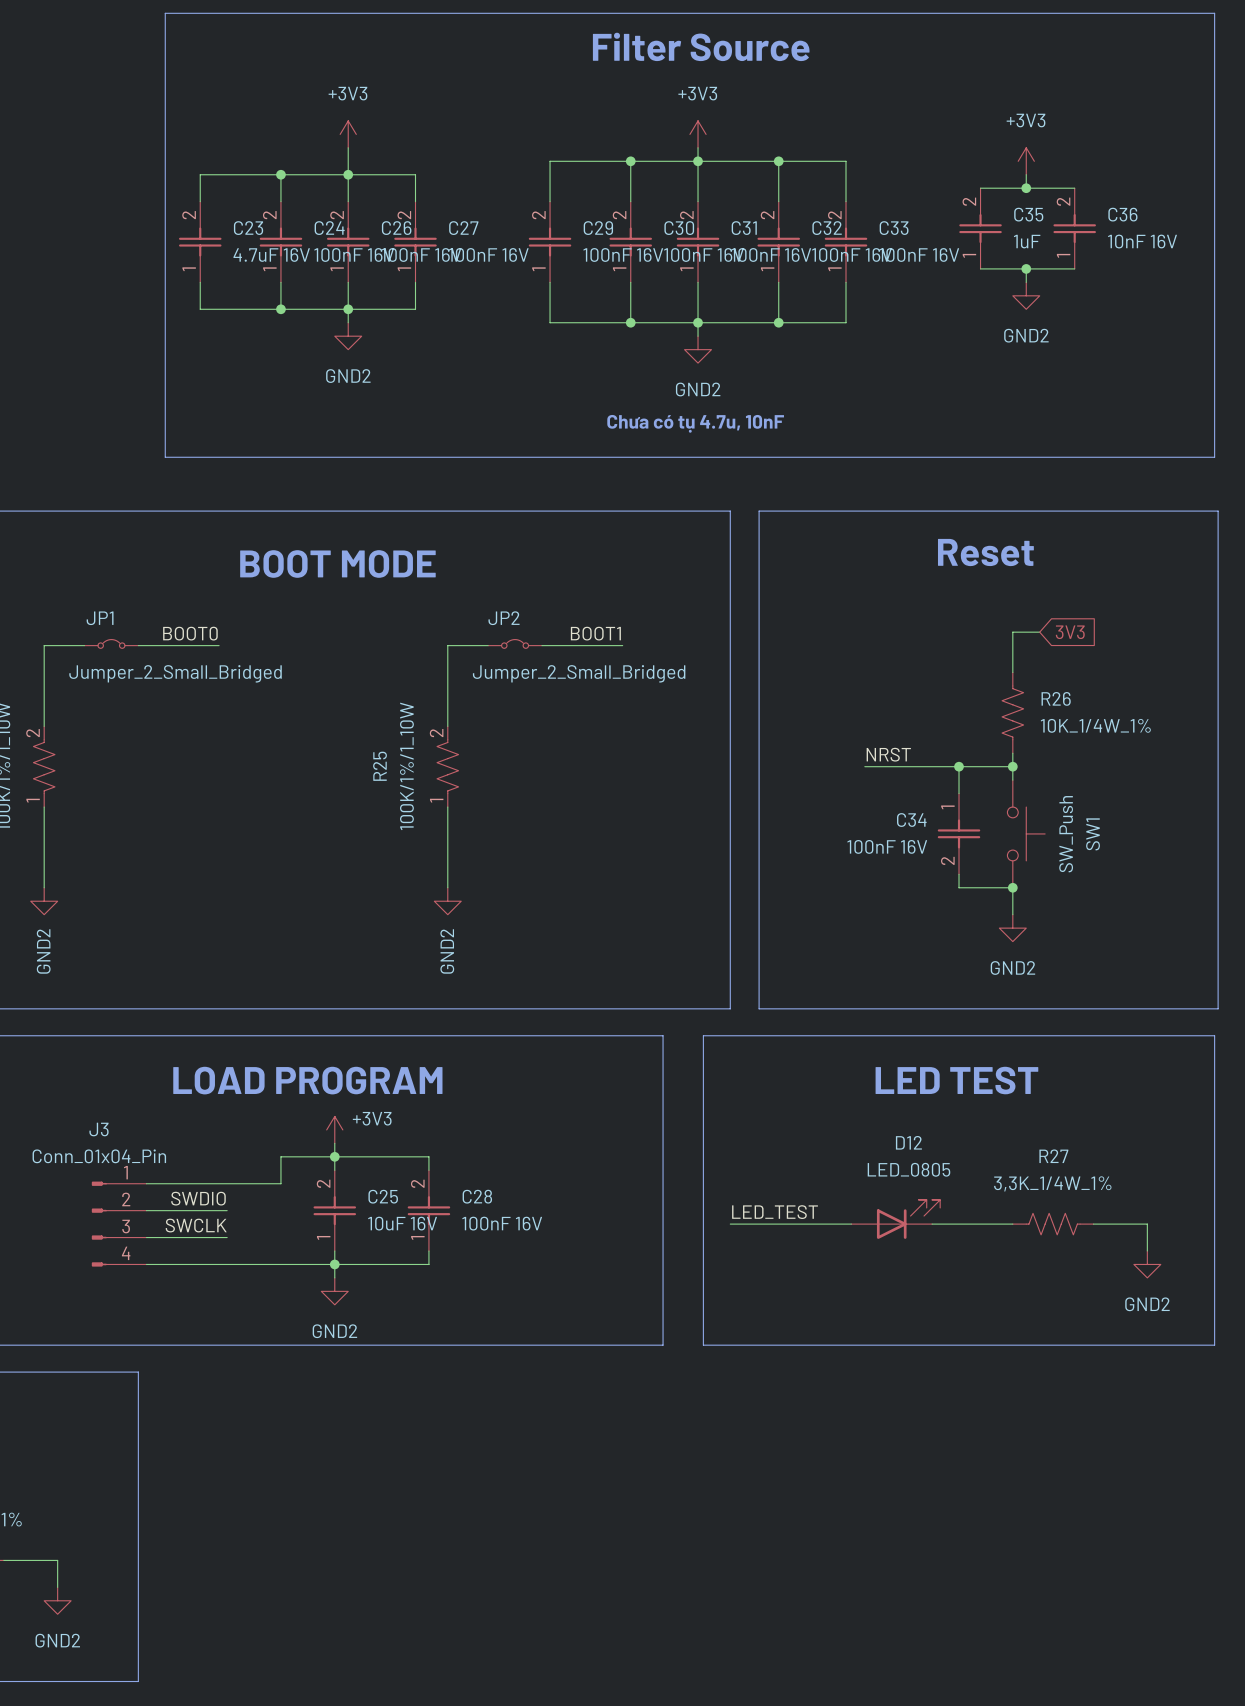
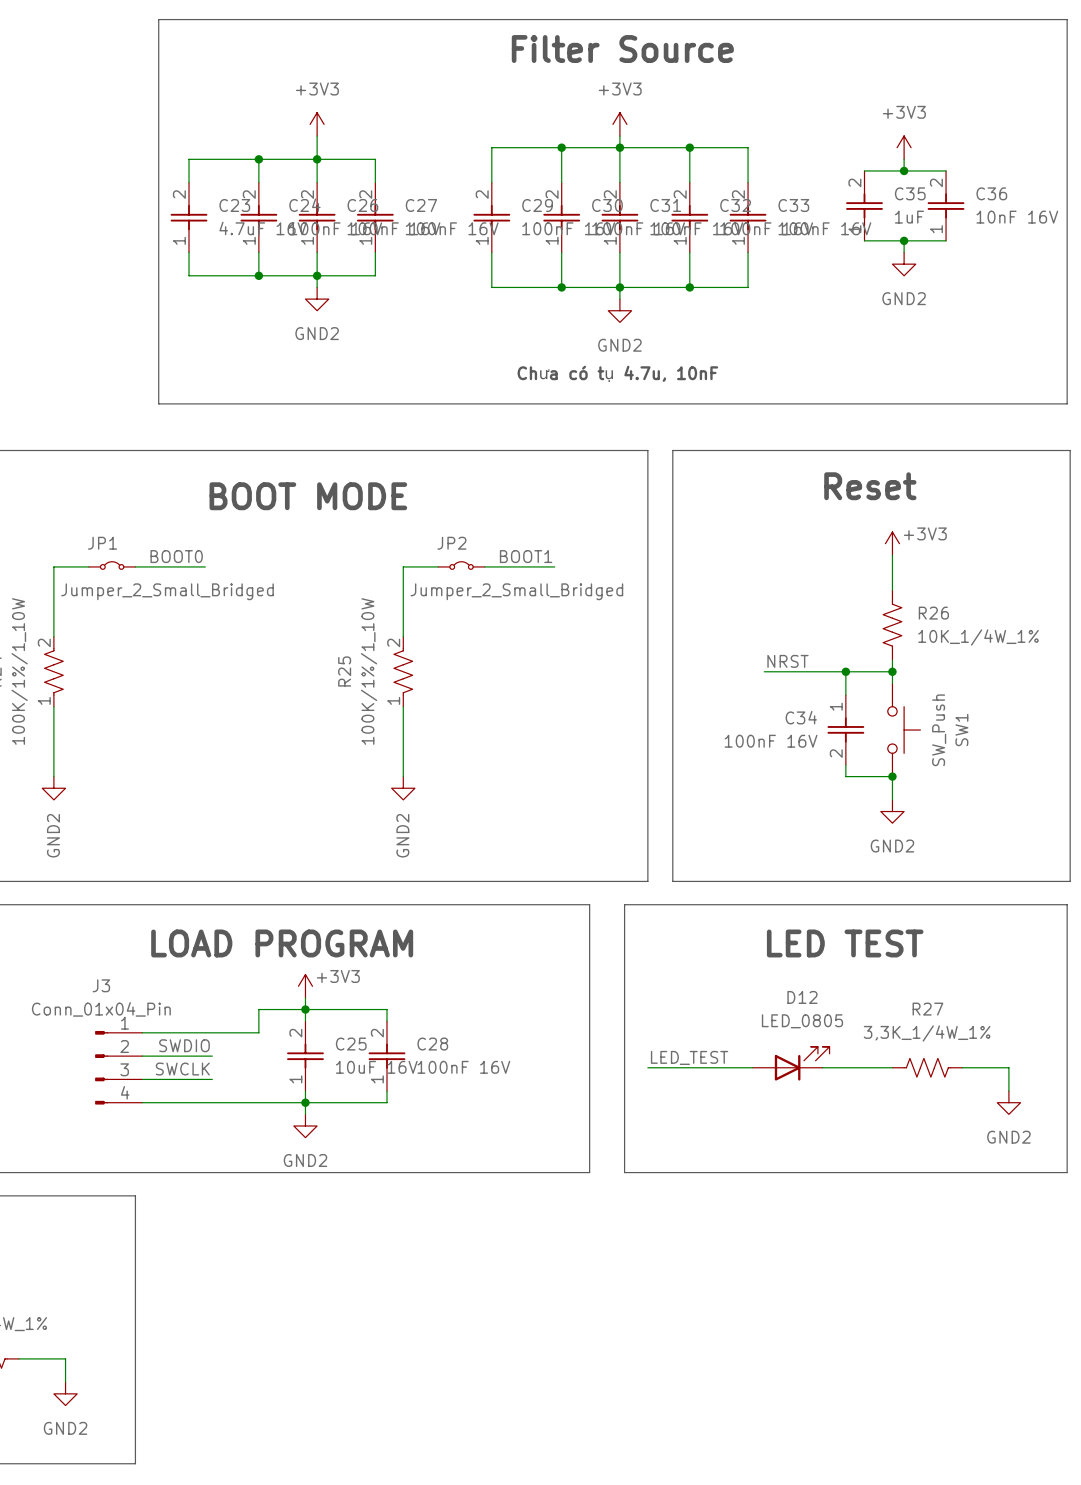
power symbol: none -> +3V3 (892, 543)
wire: (1012, 632) (1039, 632) -> none
global label: 3V3 (1070, 632) -> none

